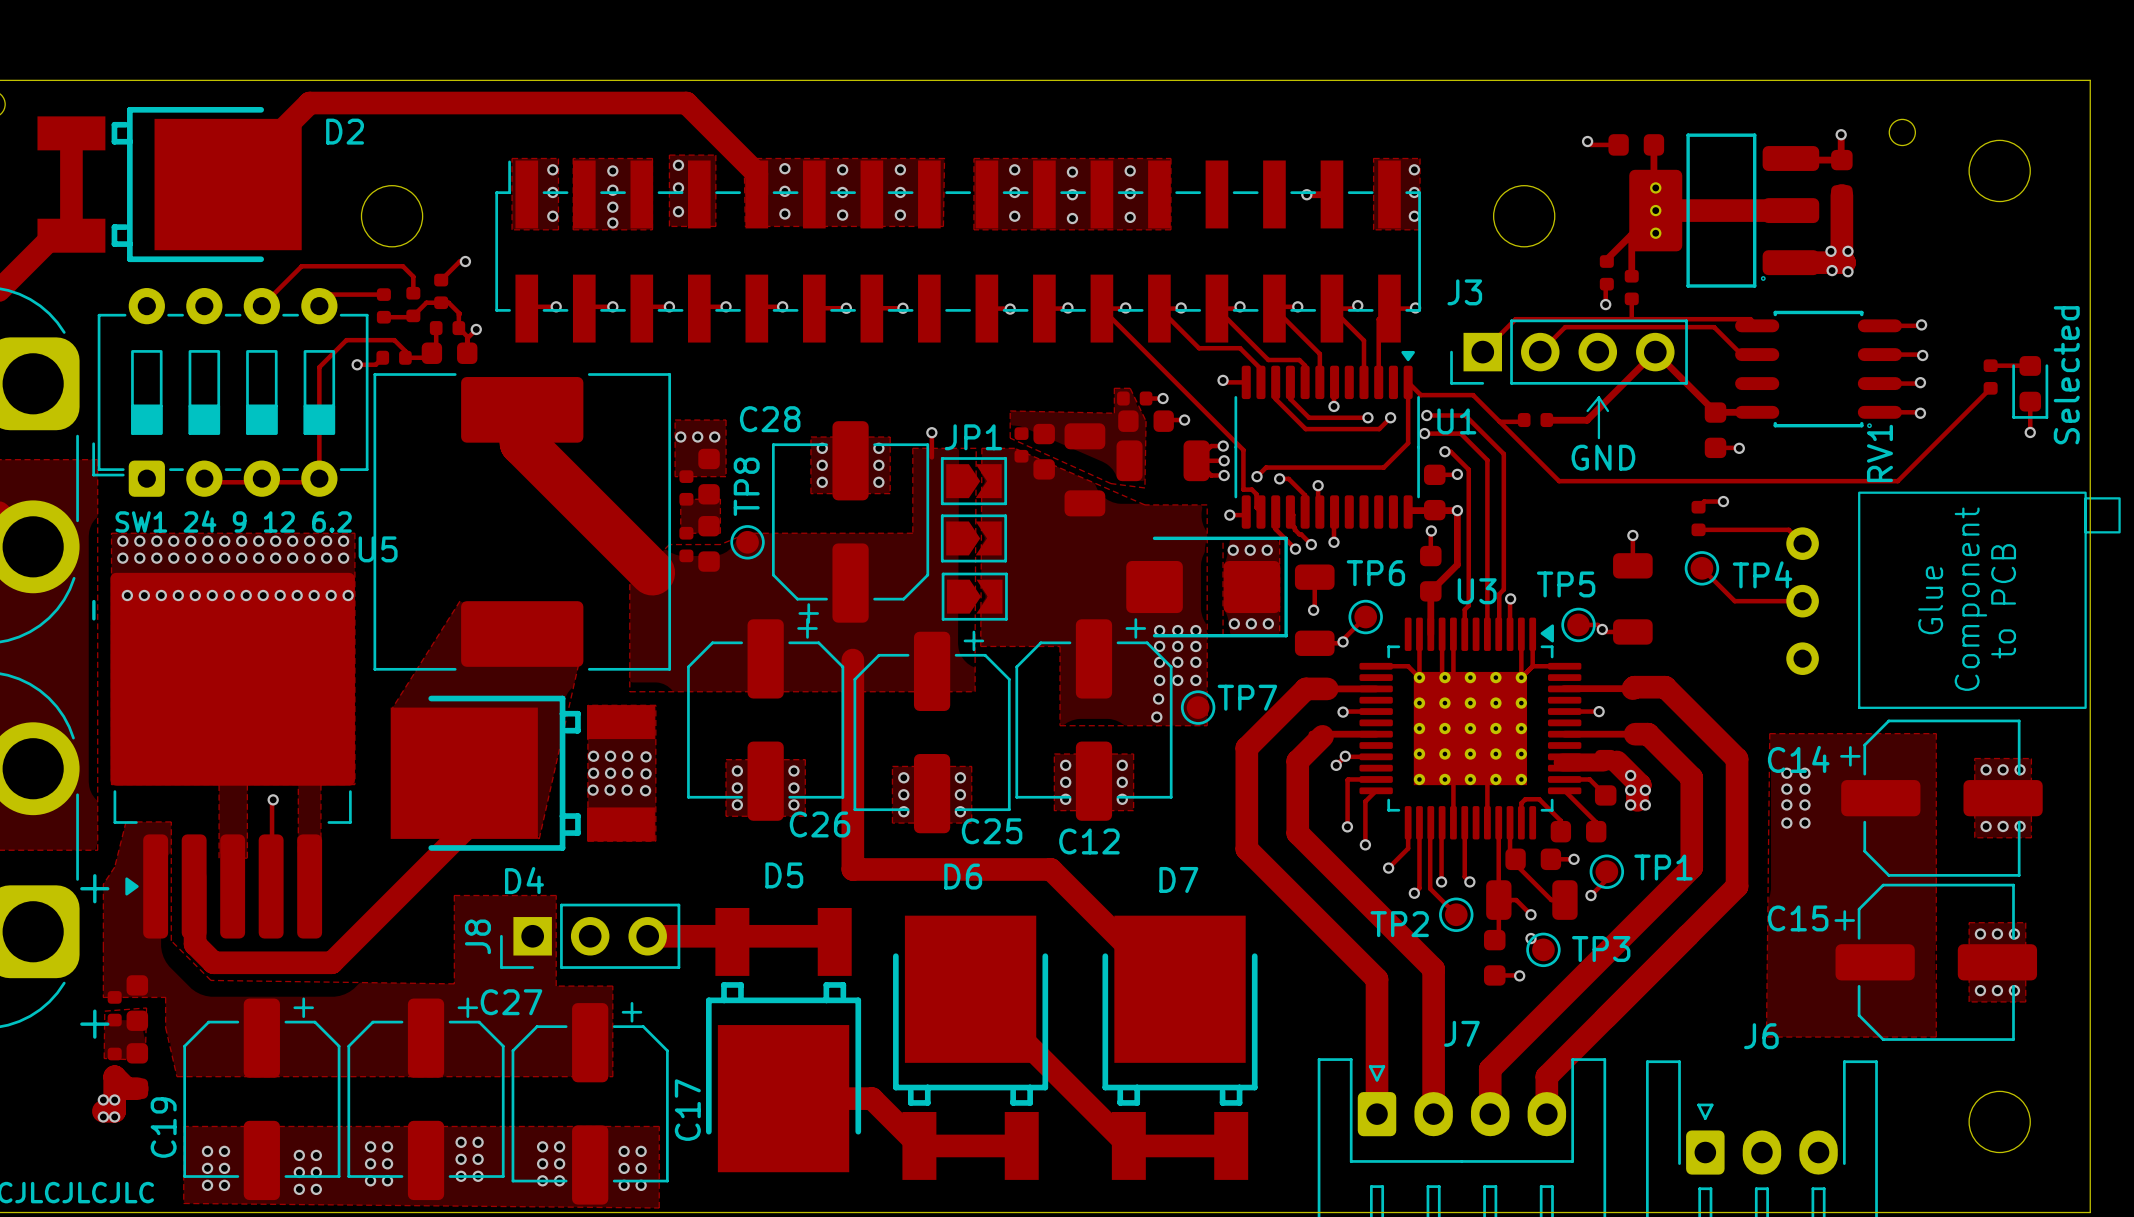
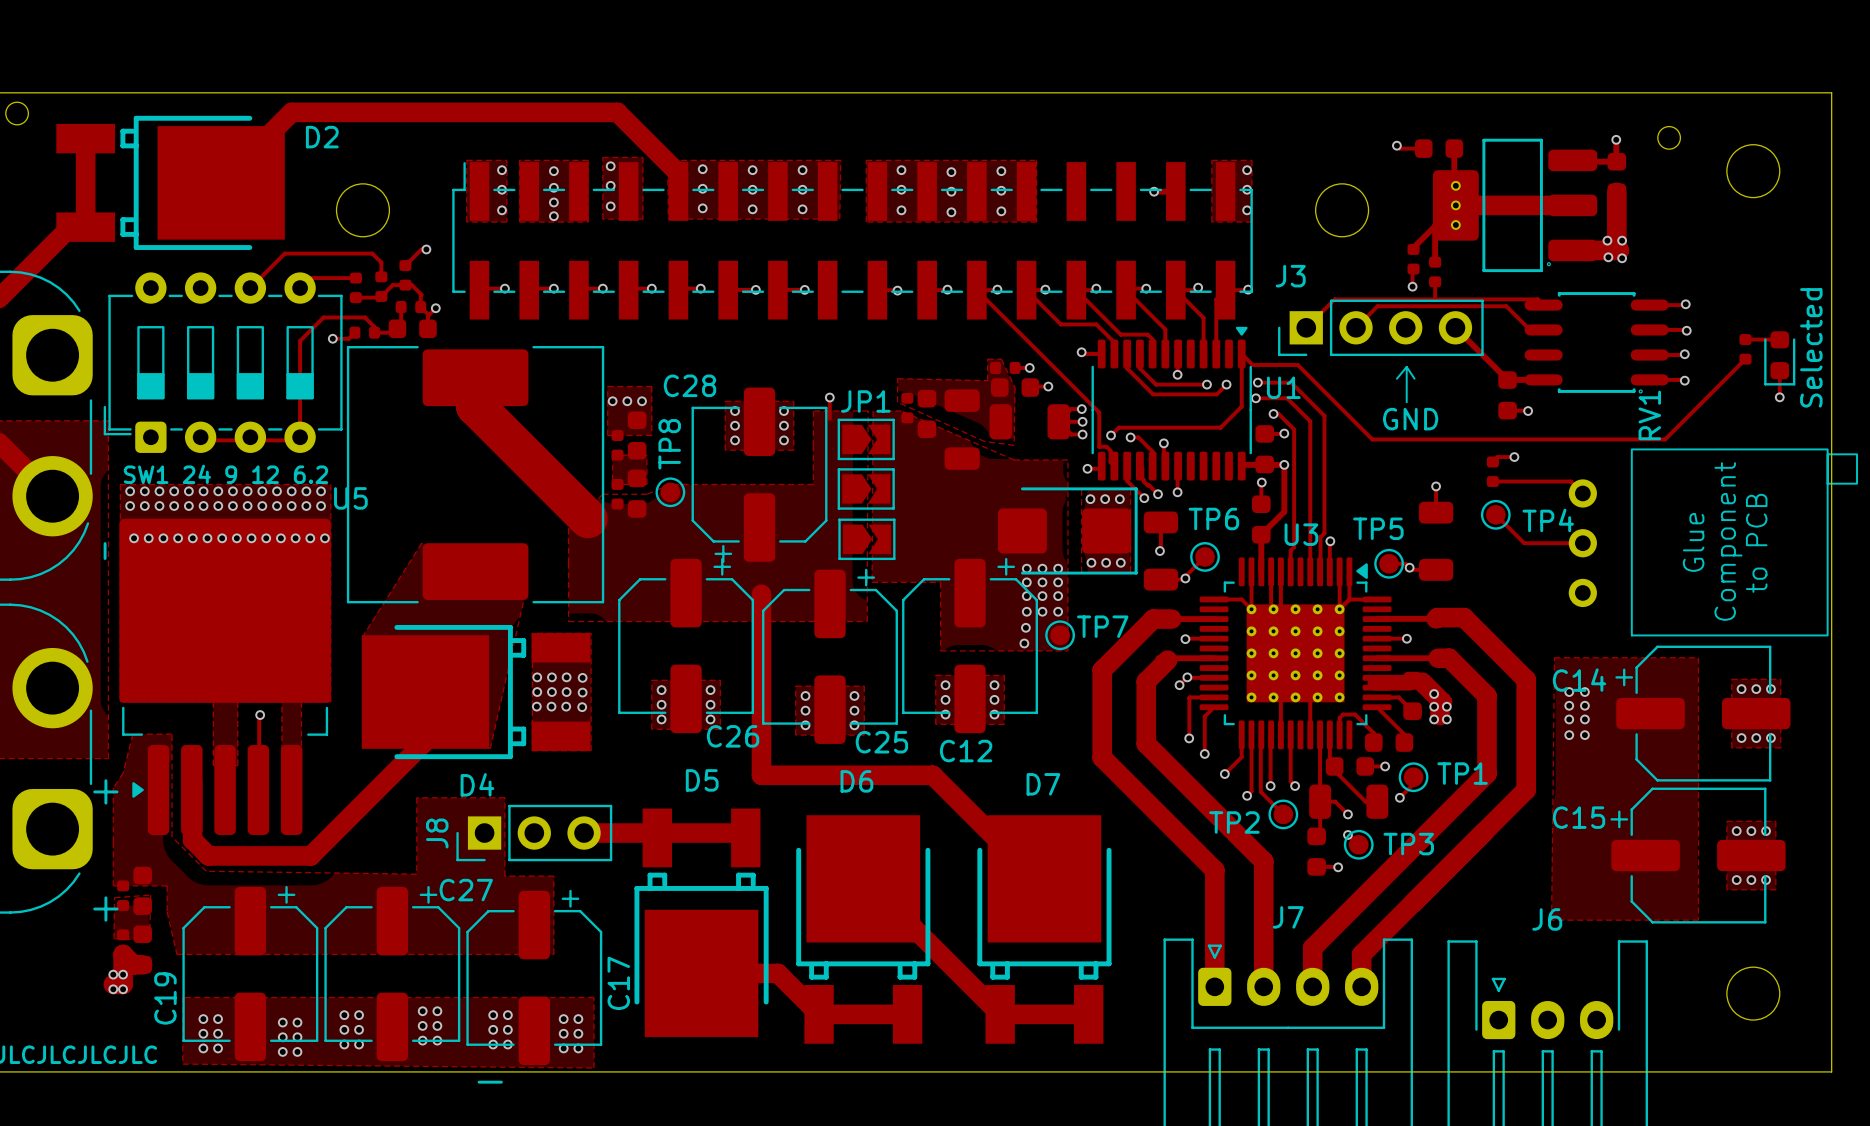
track: (1655, 352) (1587, 420) (1547, 420) -> none
track: (1524, 420) (1522, 421) (1499, 421) -> none
part: (1535, 420) -> none

